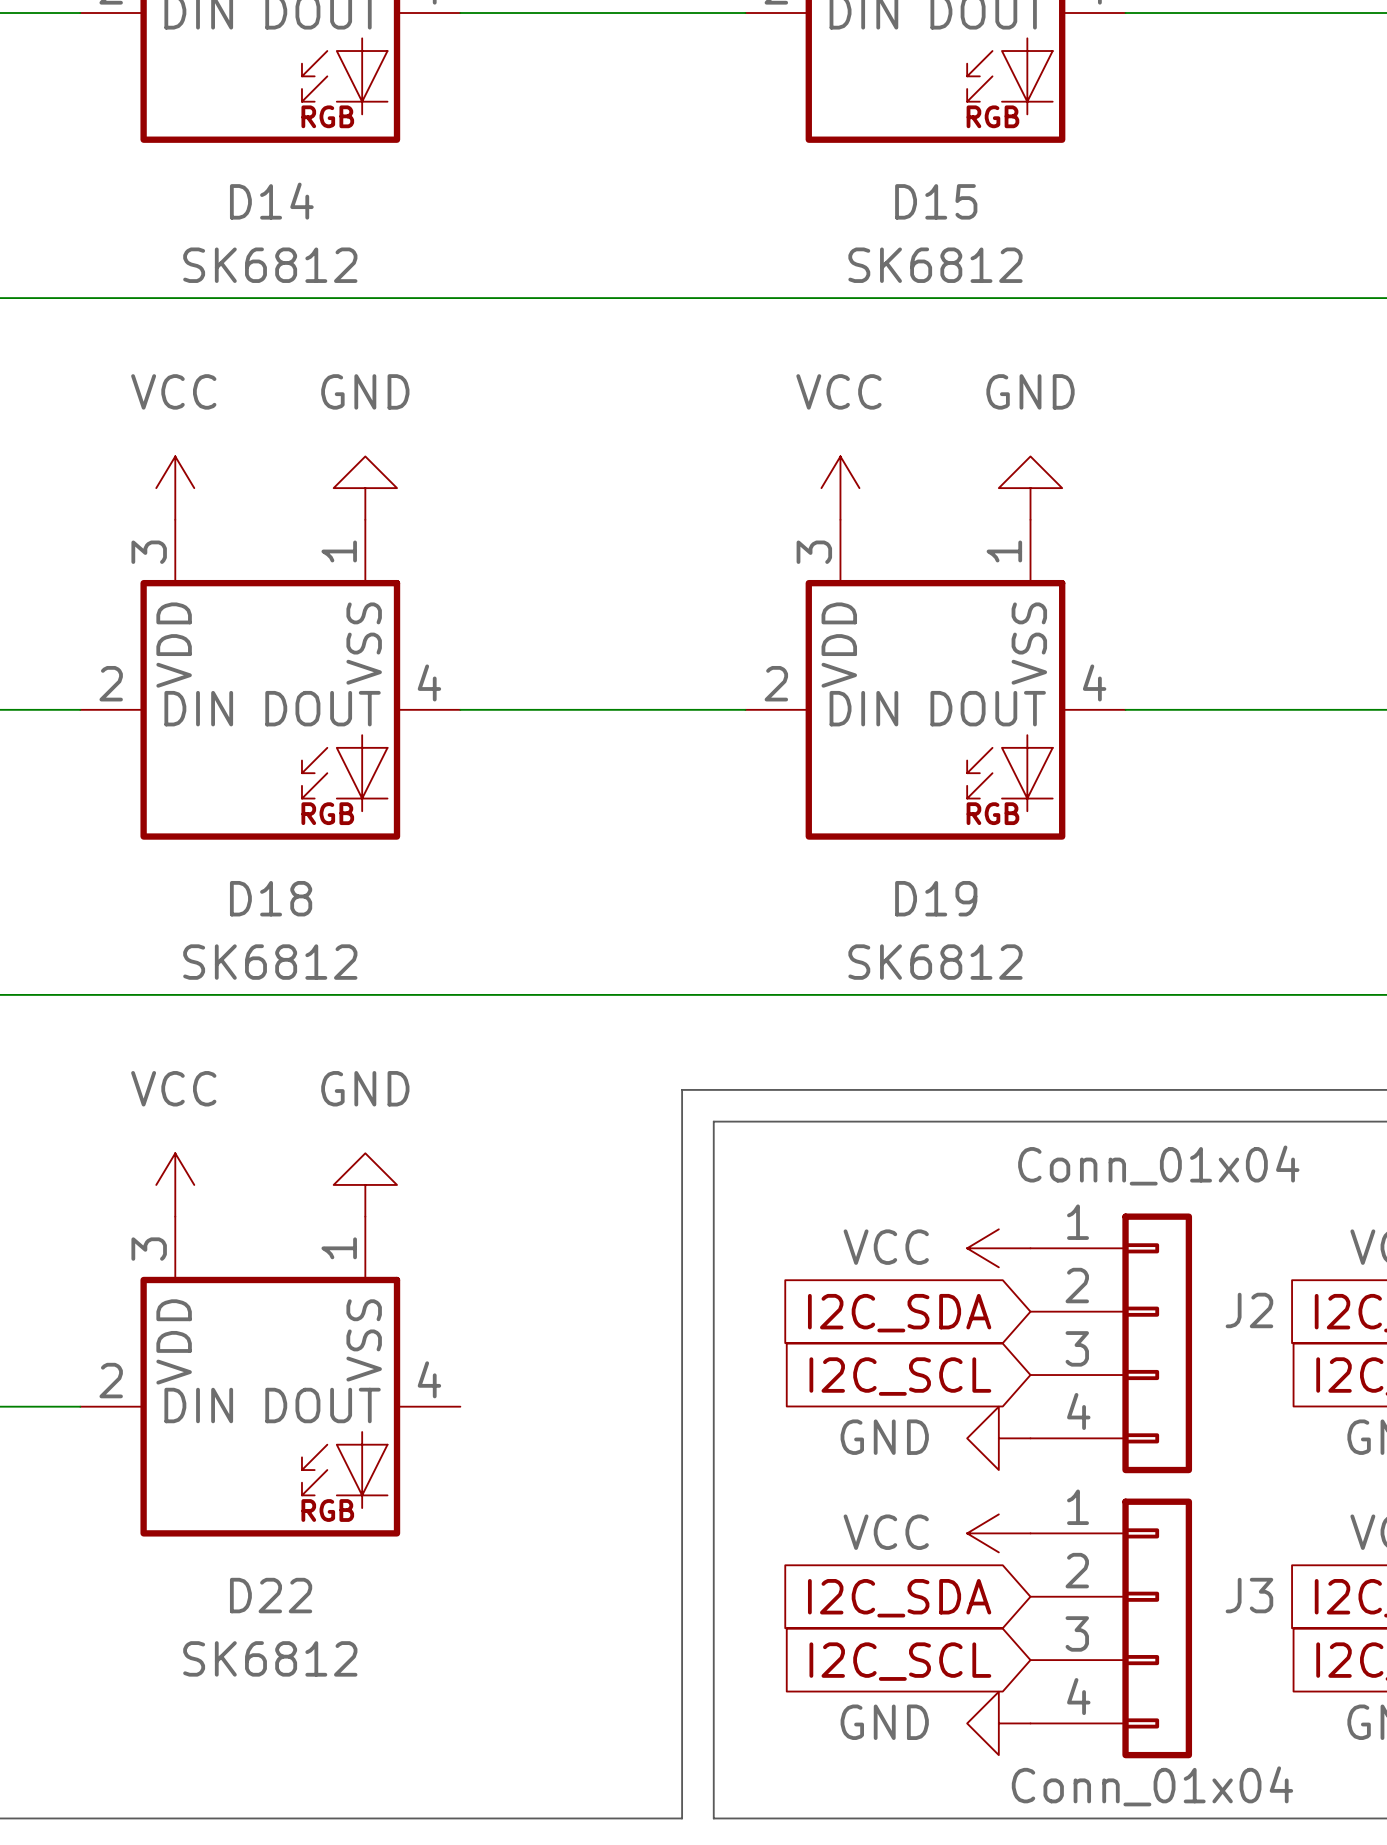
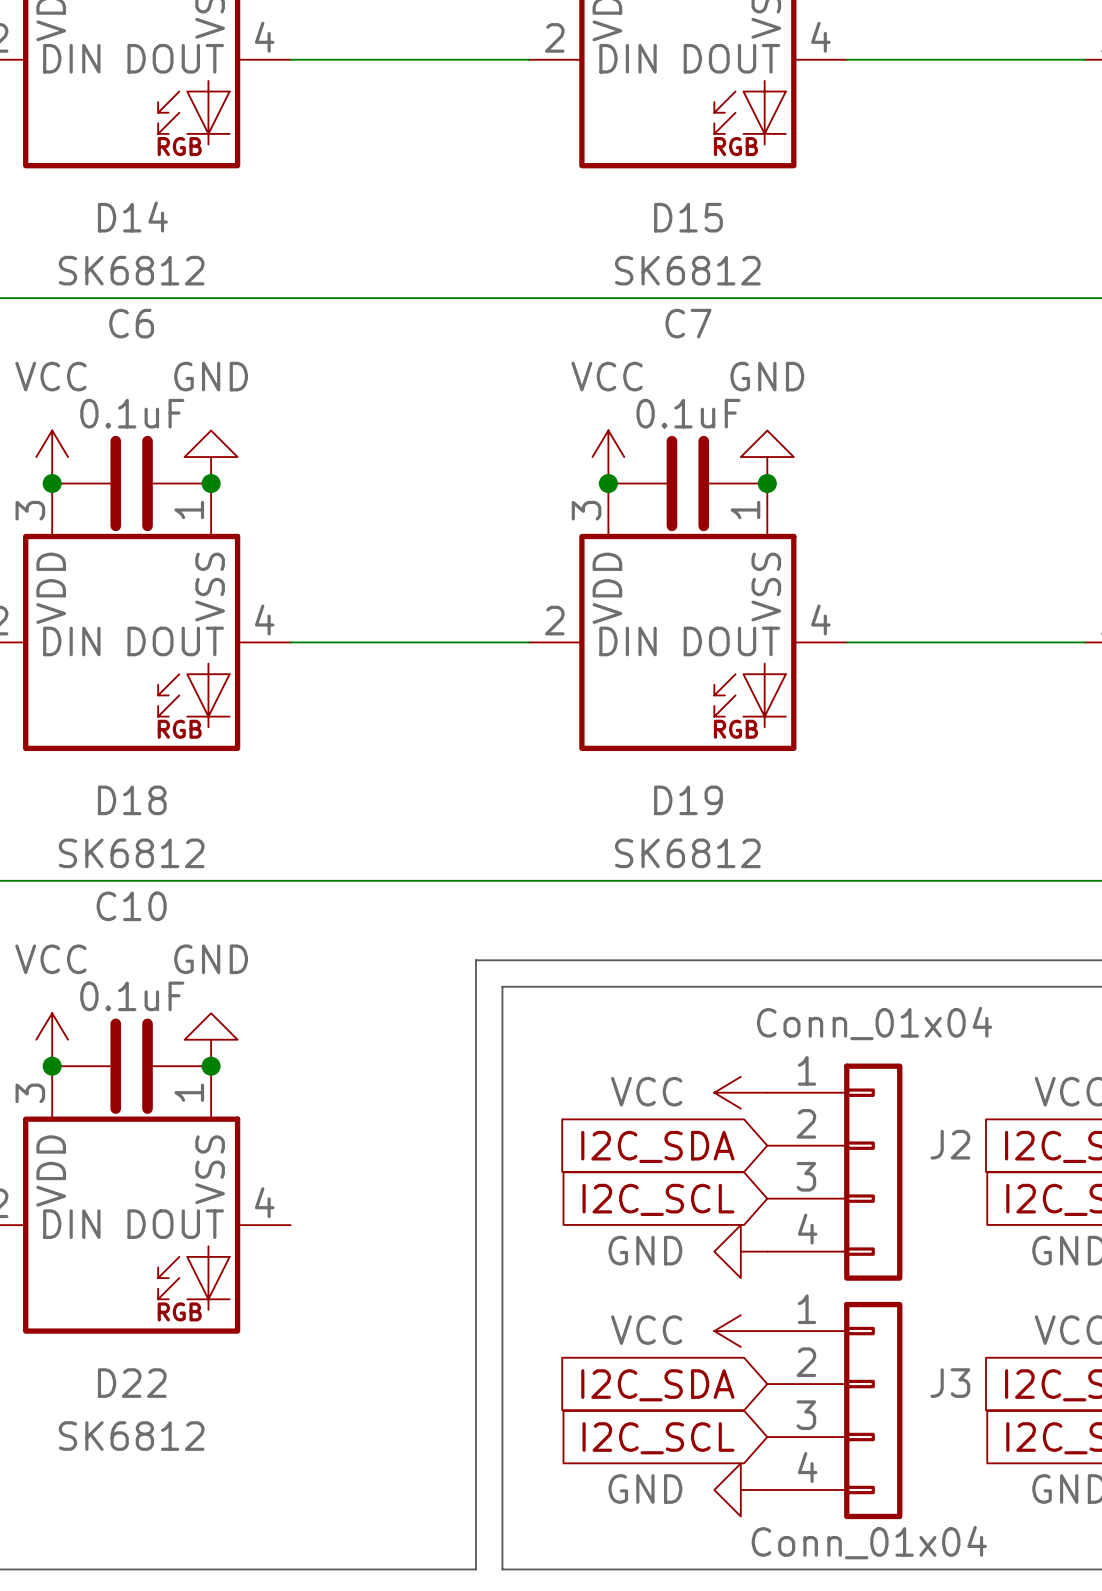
junction: none -> (52, 483)
C6: none -> 0.1uF (131, 483)
junction: none -> (211, 483)
junction: none -> (608, 483)
C7: none -> 0.1uF (687, 483)
junction: none -> (767, 483)
junction: none -> (52, 1066)
C10: none -> 0.1uF (131, 1066)
junction: none -> (211, 1066)

